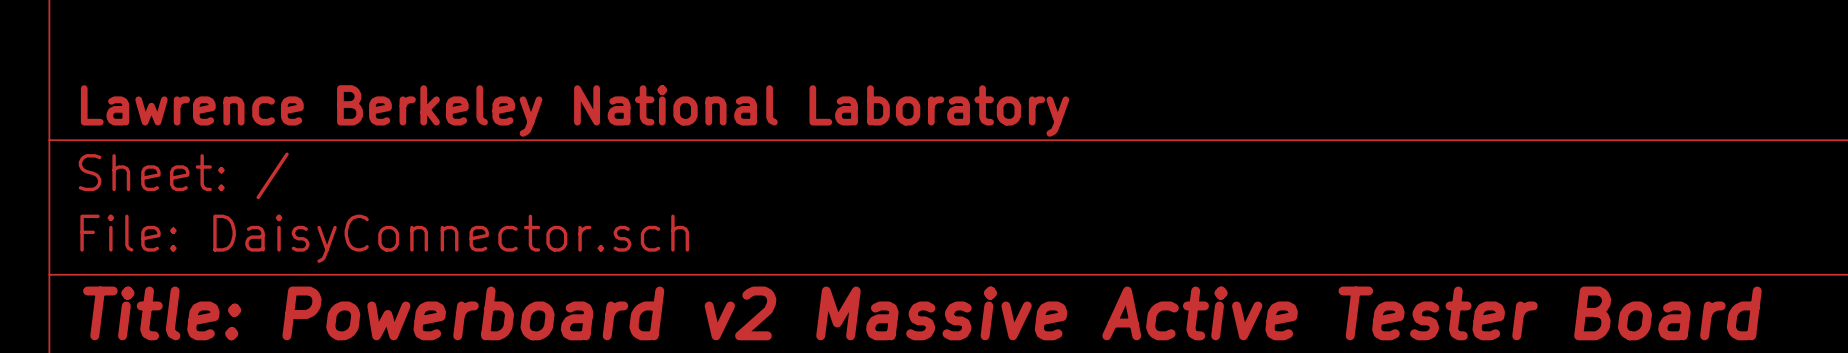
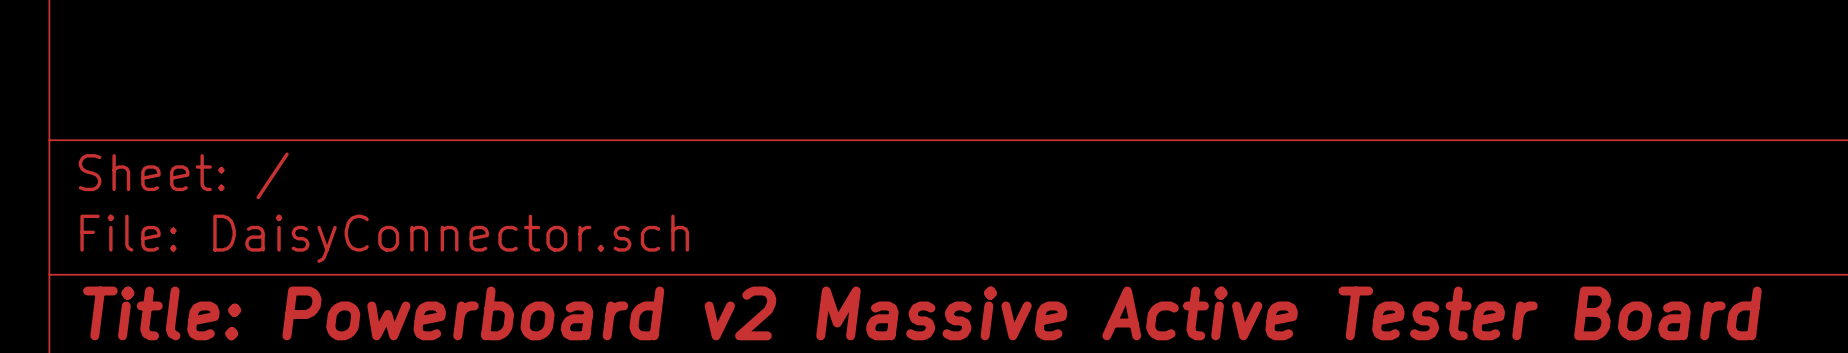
title block: Lawrence Berkeley National Laboratory (575, 110) -> none

